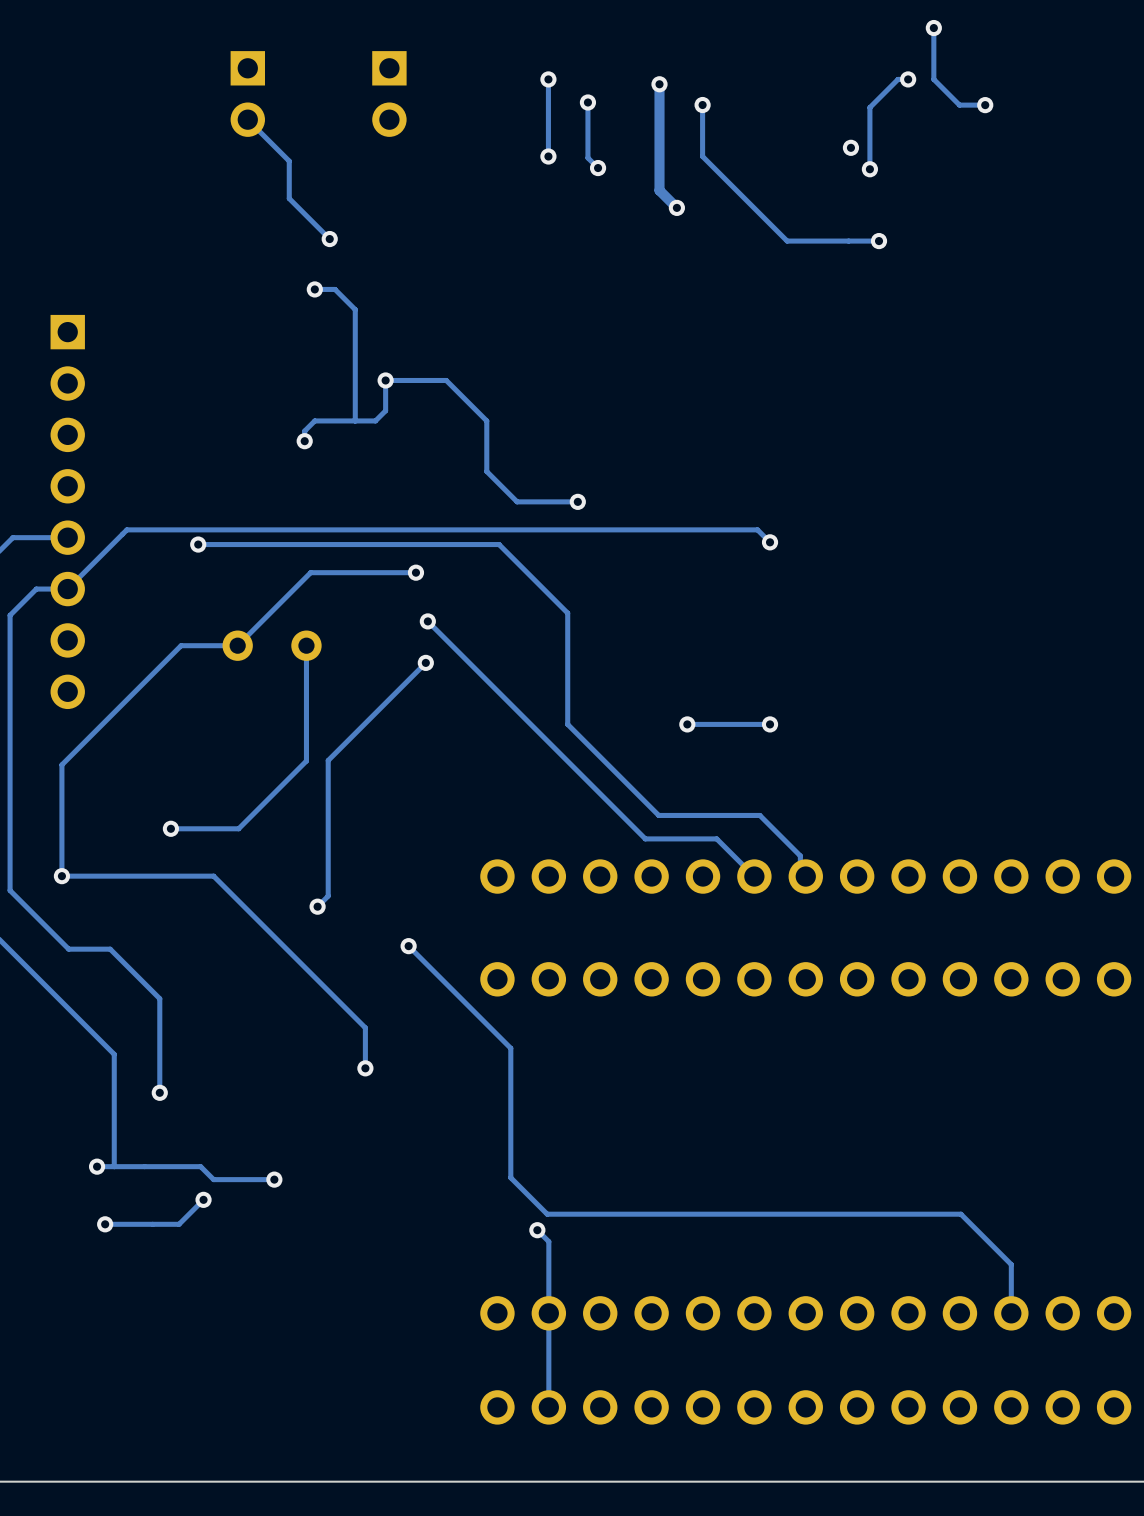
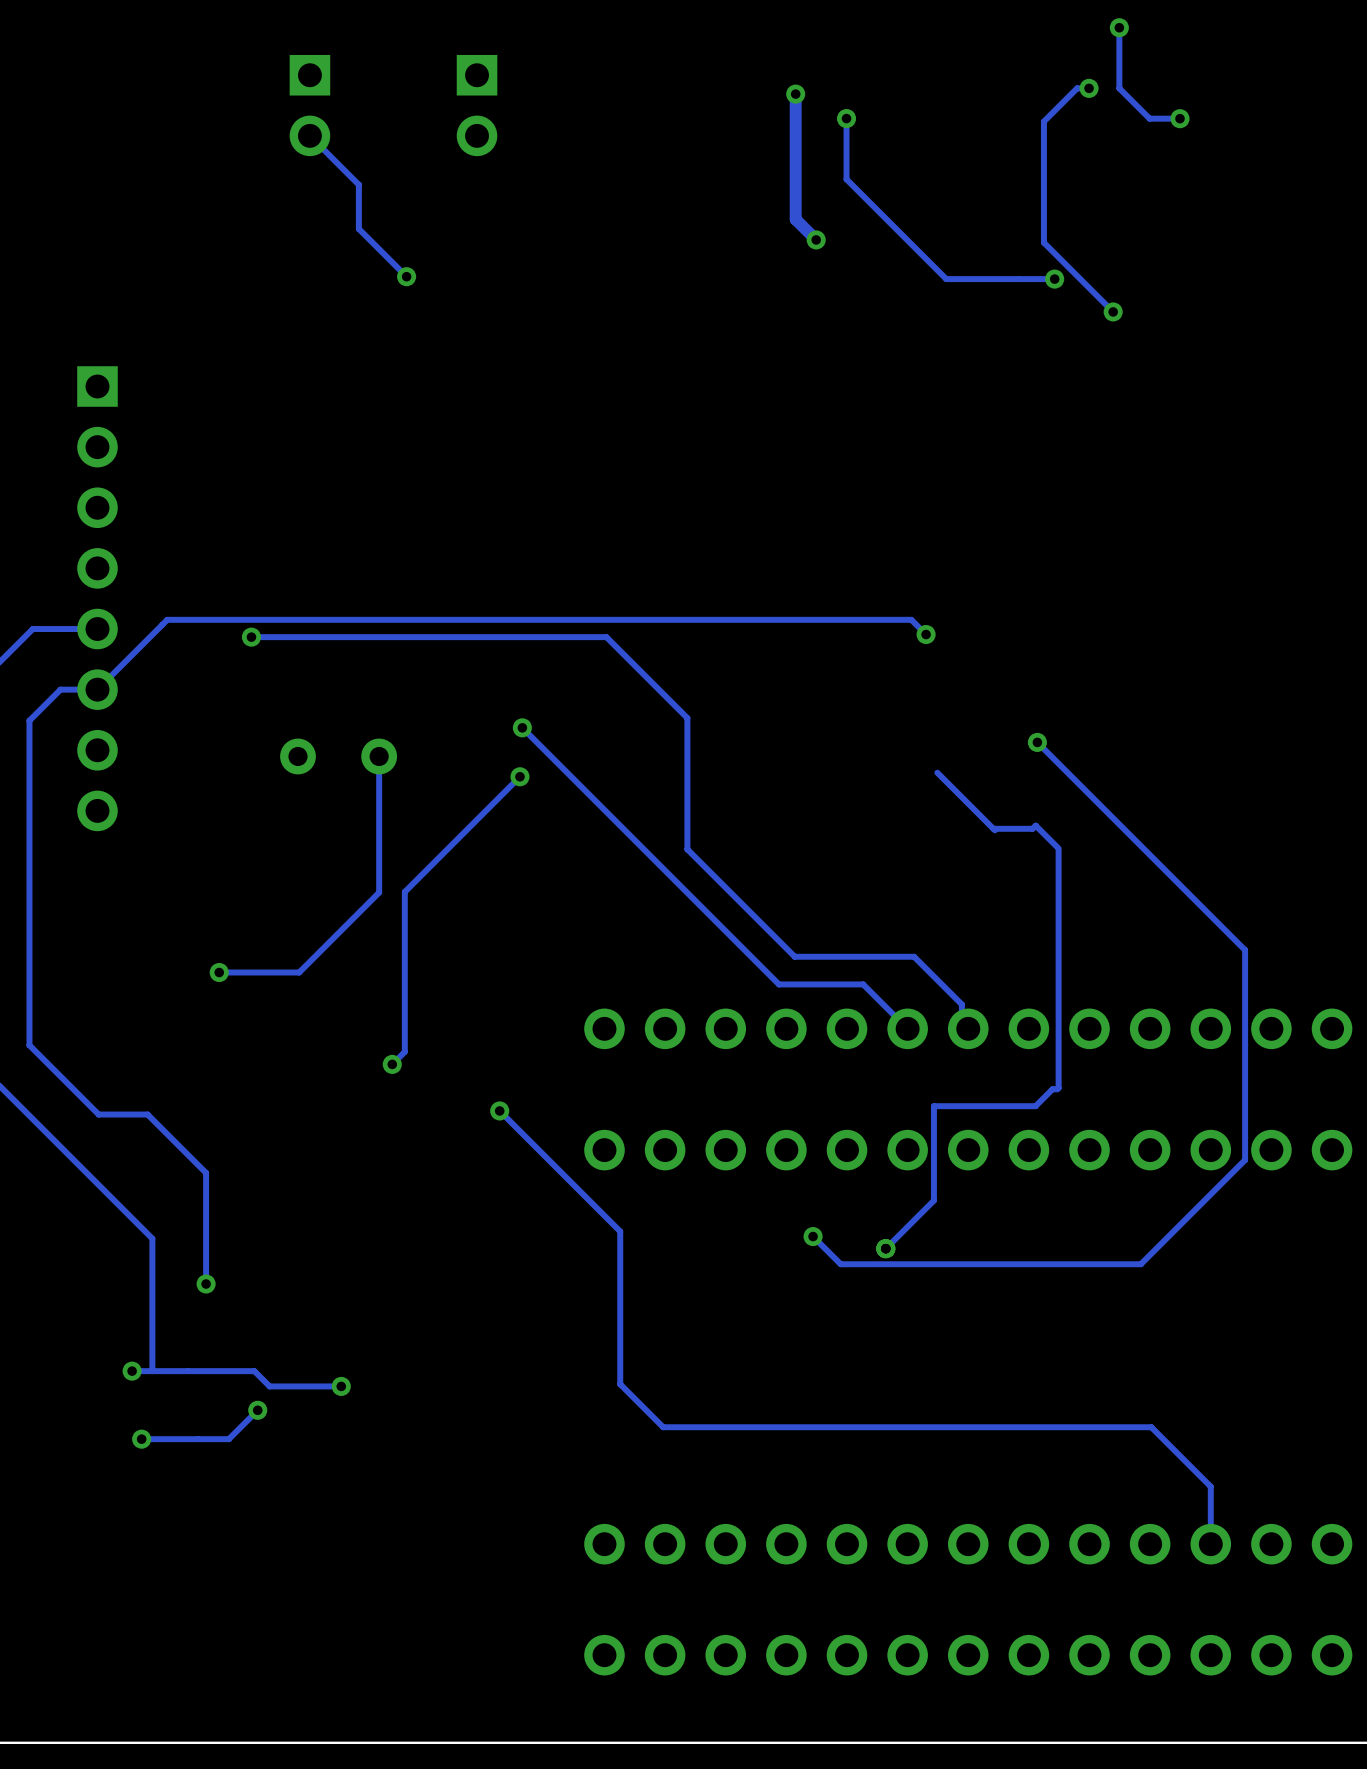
track: (548, 79) (548, 156) -> none
via: (548, 79) -> none
track: (587, 102) (587, 157) (598, 168) -> none
via: (587, 102) -> none
via: (850, 147) -> none
via: (548, 156) -> none
via: (598, 168) -> none
track: none -> (1043, 194) (1043, 242) (1113, 311)
via: (869, 169) -> none
via: none -> (1113, 311)
track: (314, 289) (335, 289) (355, 309) (355, 420) -> none
via: (314, 289) -> none
via: (385, 380) -> none
track: (304, 441) (304, 431) (314, 420) (375, 420) (385, 410) (385, 380) (446, 380) (486, 420) (486, 471) (517, 501) (577, 501) -> none
via: (304, 441) -> none
via: (577, 501) -> none
track: (415, 572) (310, 572) (237, 645) (181, 645) (61, 764) (61, 876) (213, 876) (365, 1027) (365, 1068) -> none
via: (415, 572) -> none
track: none -> (1037, 742) (1245, 950) (1245, 1160) (1140, 1264) (840, 1264) (813, 1236)
via: none -> (1037, 742)
track: none -> (937, 772) (994, 830)
track: none -> (993, 828) (1032, 828) (1035, 825) (1058, 848)
via: (687, 724) -> none
track: (770, 724) (687, 724) -> none
via: (770, 724) -> none
track: none -> (1058, 850) (1058, 1088) (1052, 1089) (1035, 1106) (933, 1106) (933, 1200) (885, 1248)
via: (61, 876) -> none
via: none -> (813, 1236)
via: none -> (885, 1248)
via: (365, 1068) -> none
track: (537, 1230) (548, 1241) (548, 1407) -> none
via: (537, 1230) -> none

